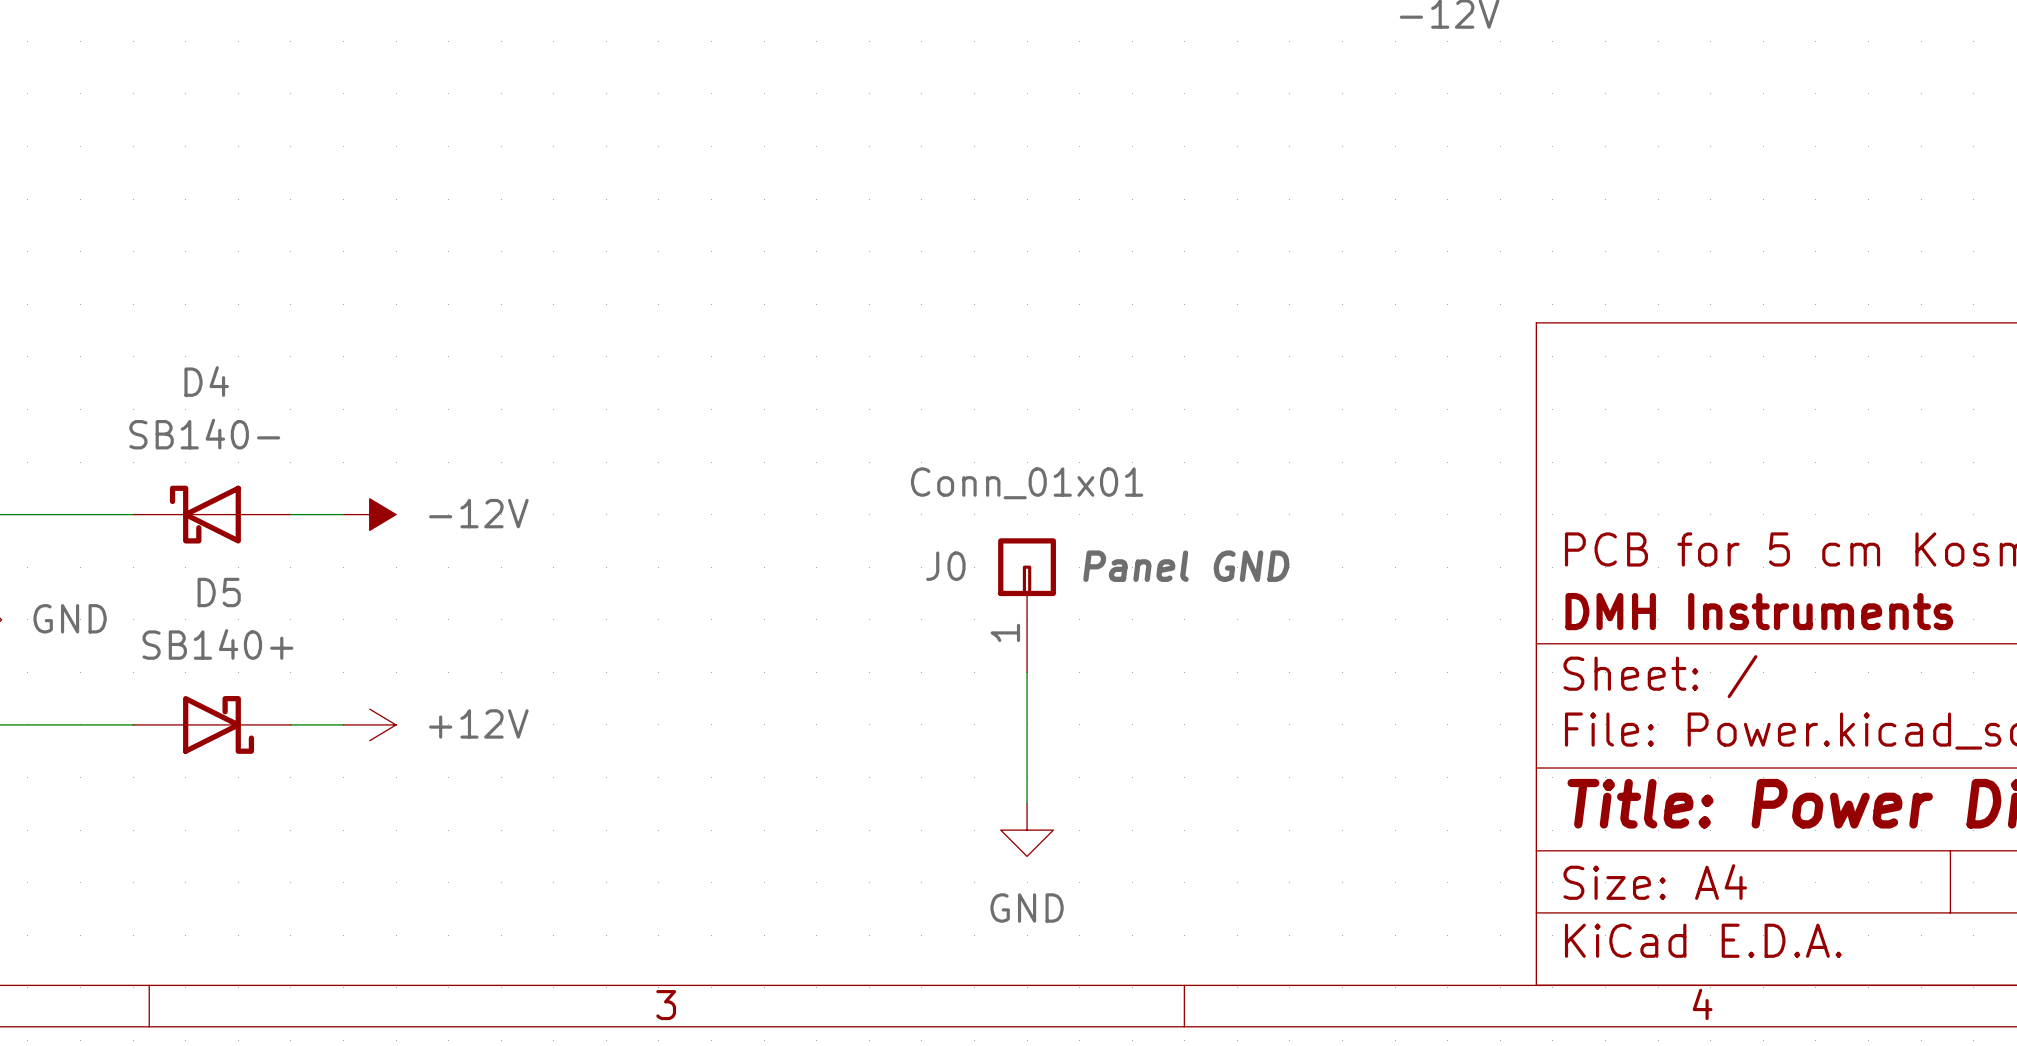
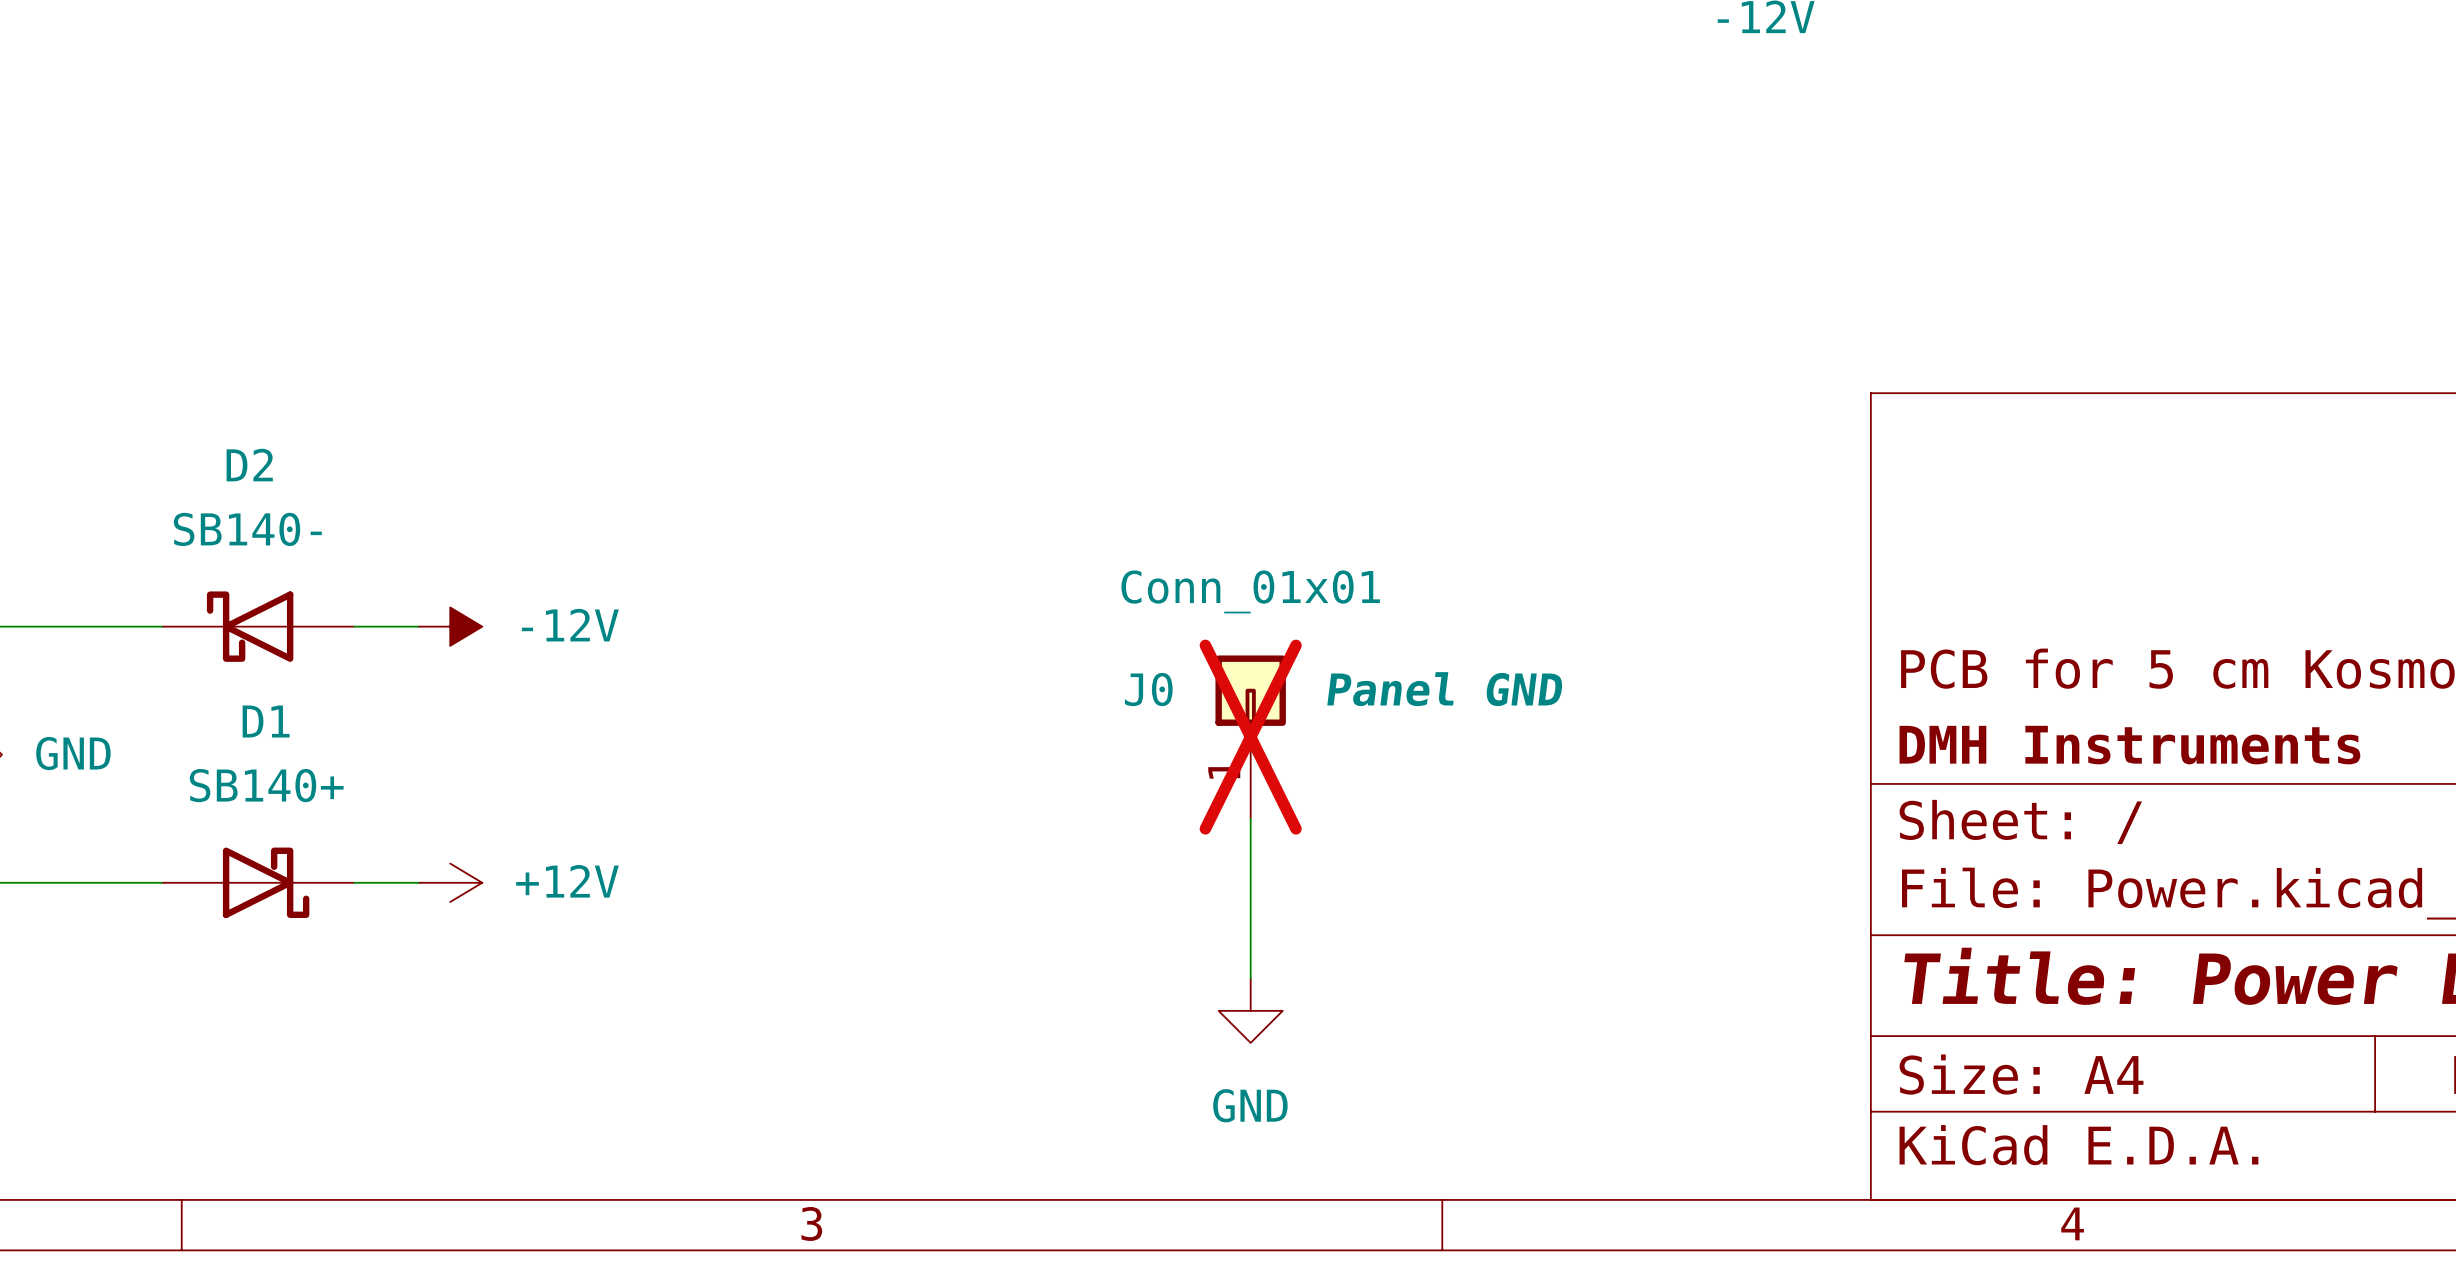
D4 name: D4 (206, 381) -> D2 (249, 465)
D5 name: D5 (219, 592) -> D1 (266, 721)
J0 do-not-place cross: none -> (1250, 737)

